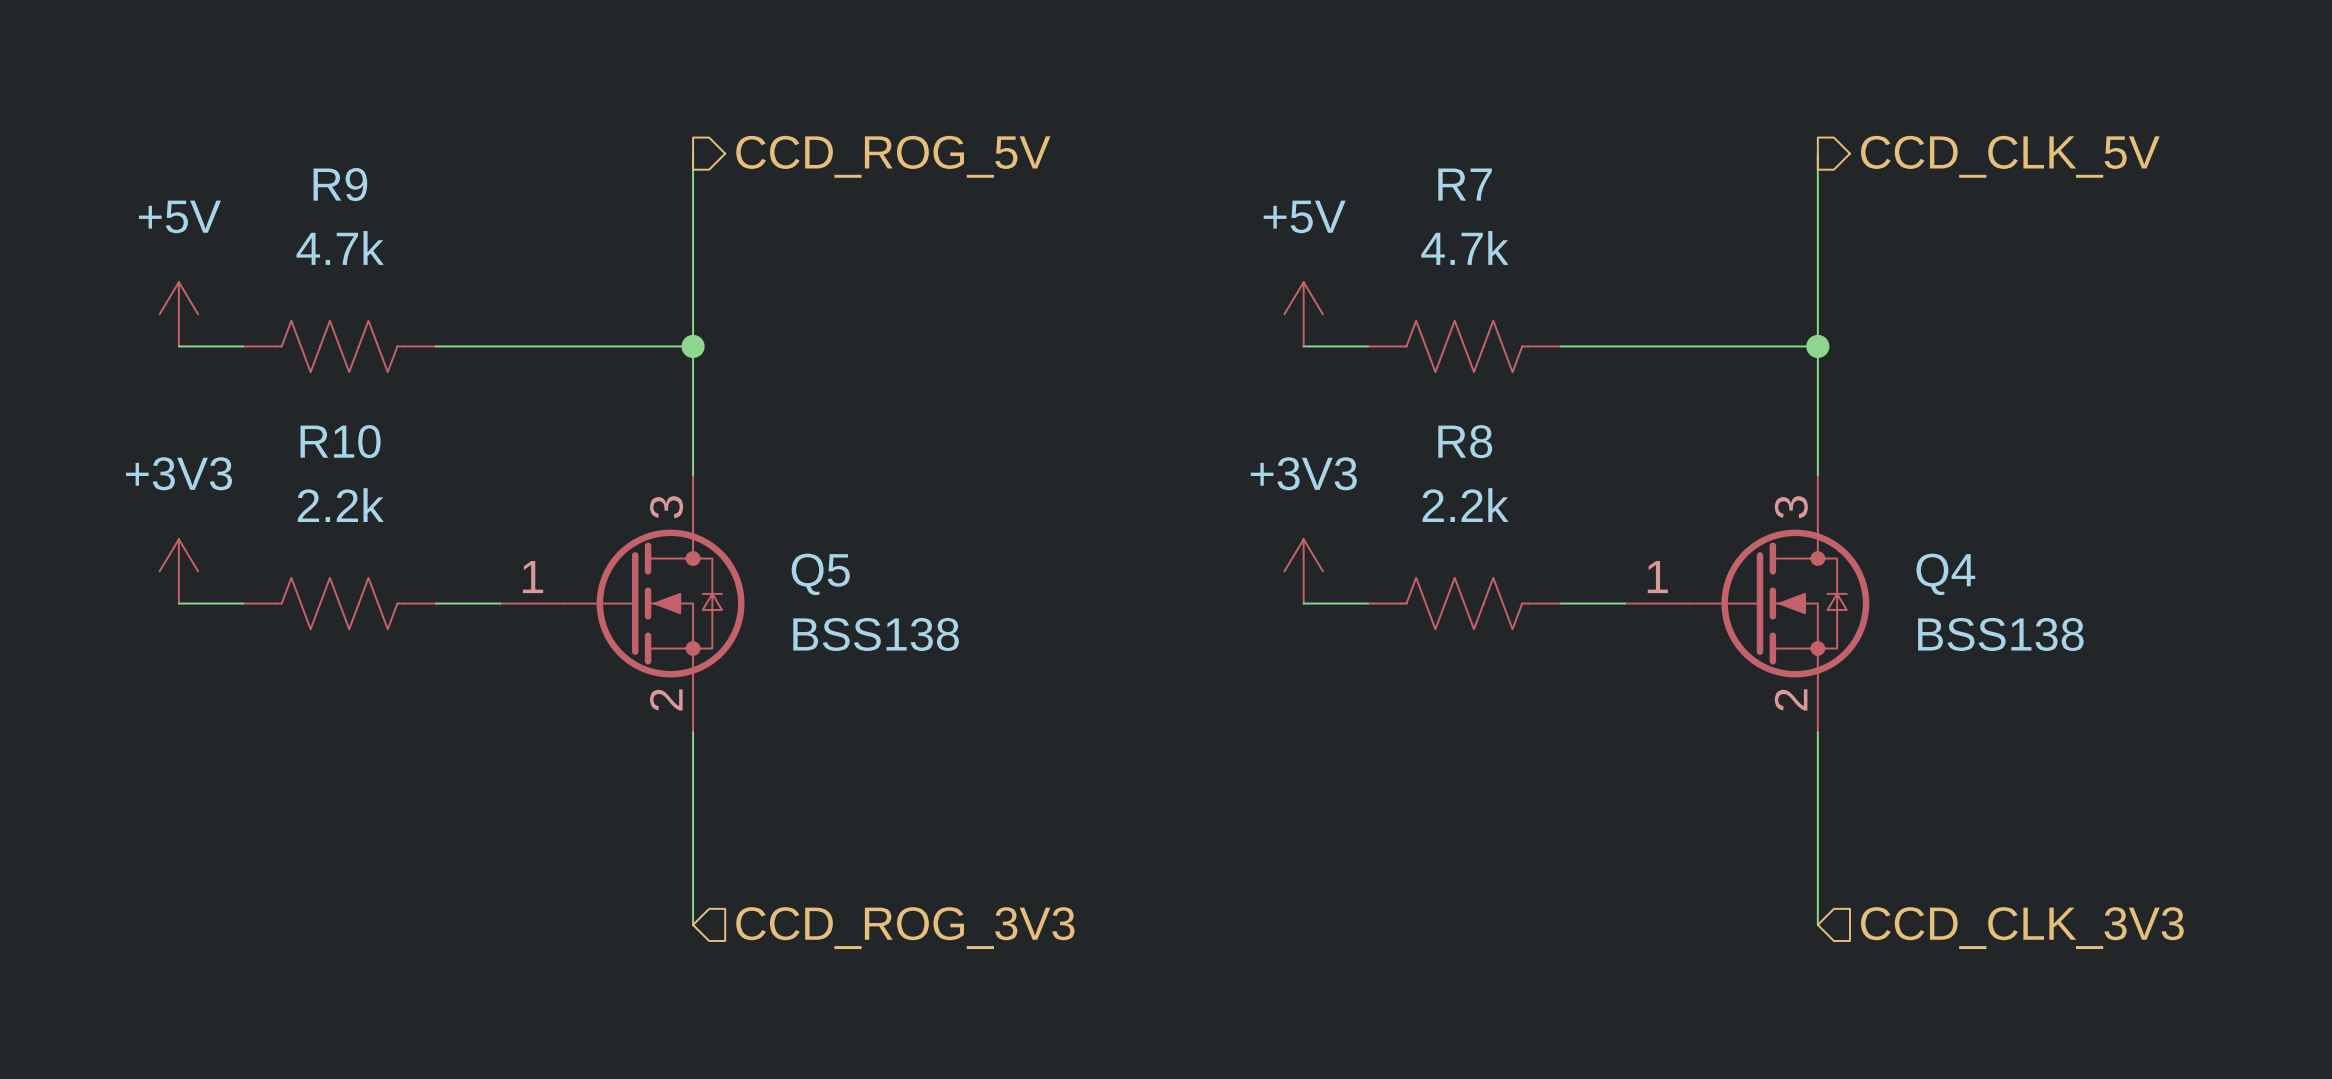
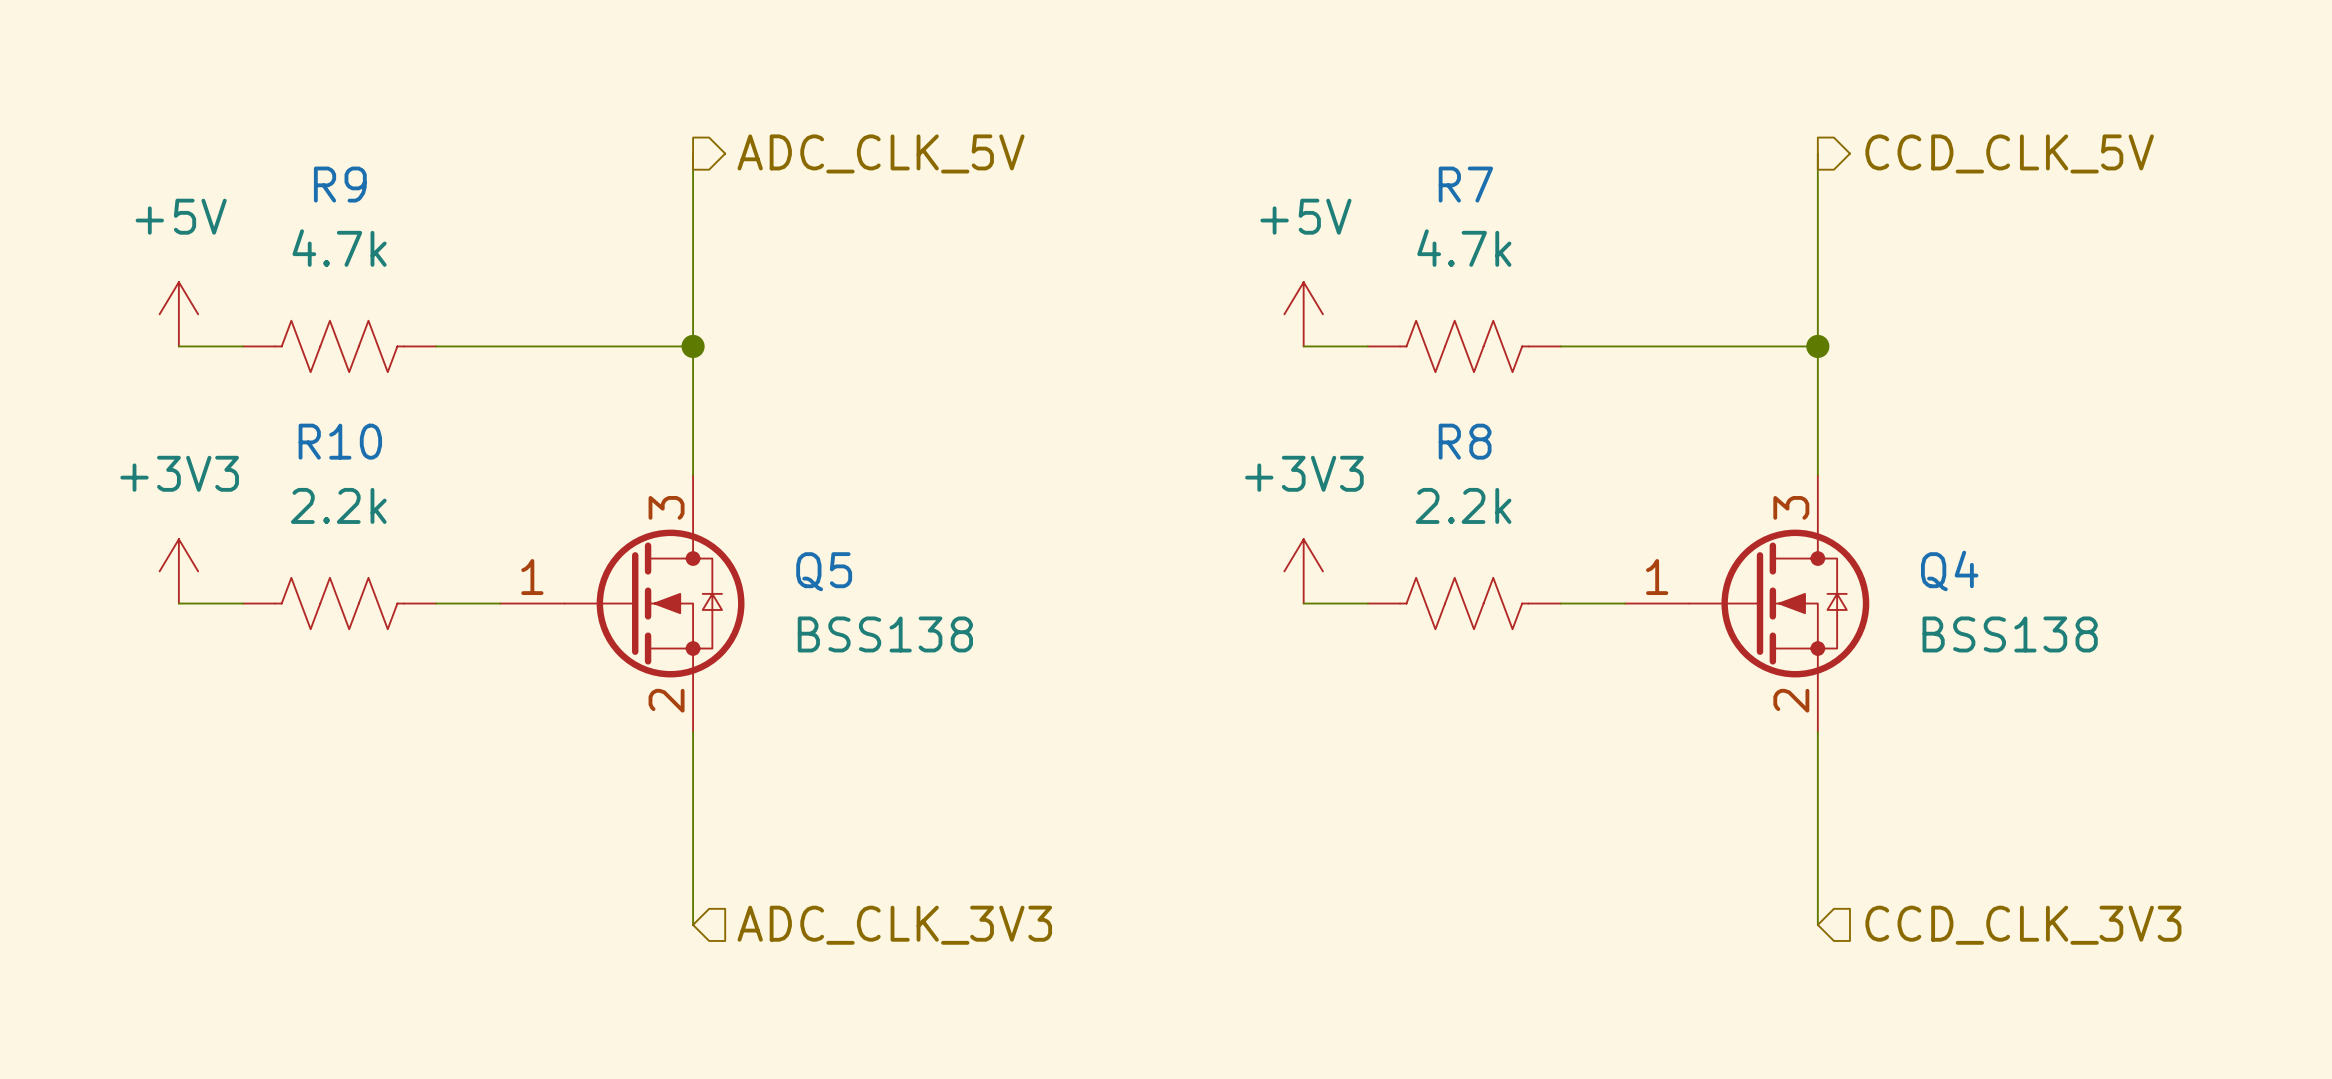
hierarchical label: CCD_ROG_5V (893, 156) -> ADC_CLK_5V (881, 153)
hierarchical label: CCD_ROG_3V3 (905, 928) -> ADC_CLK_3V3 (894, 925)

